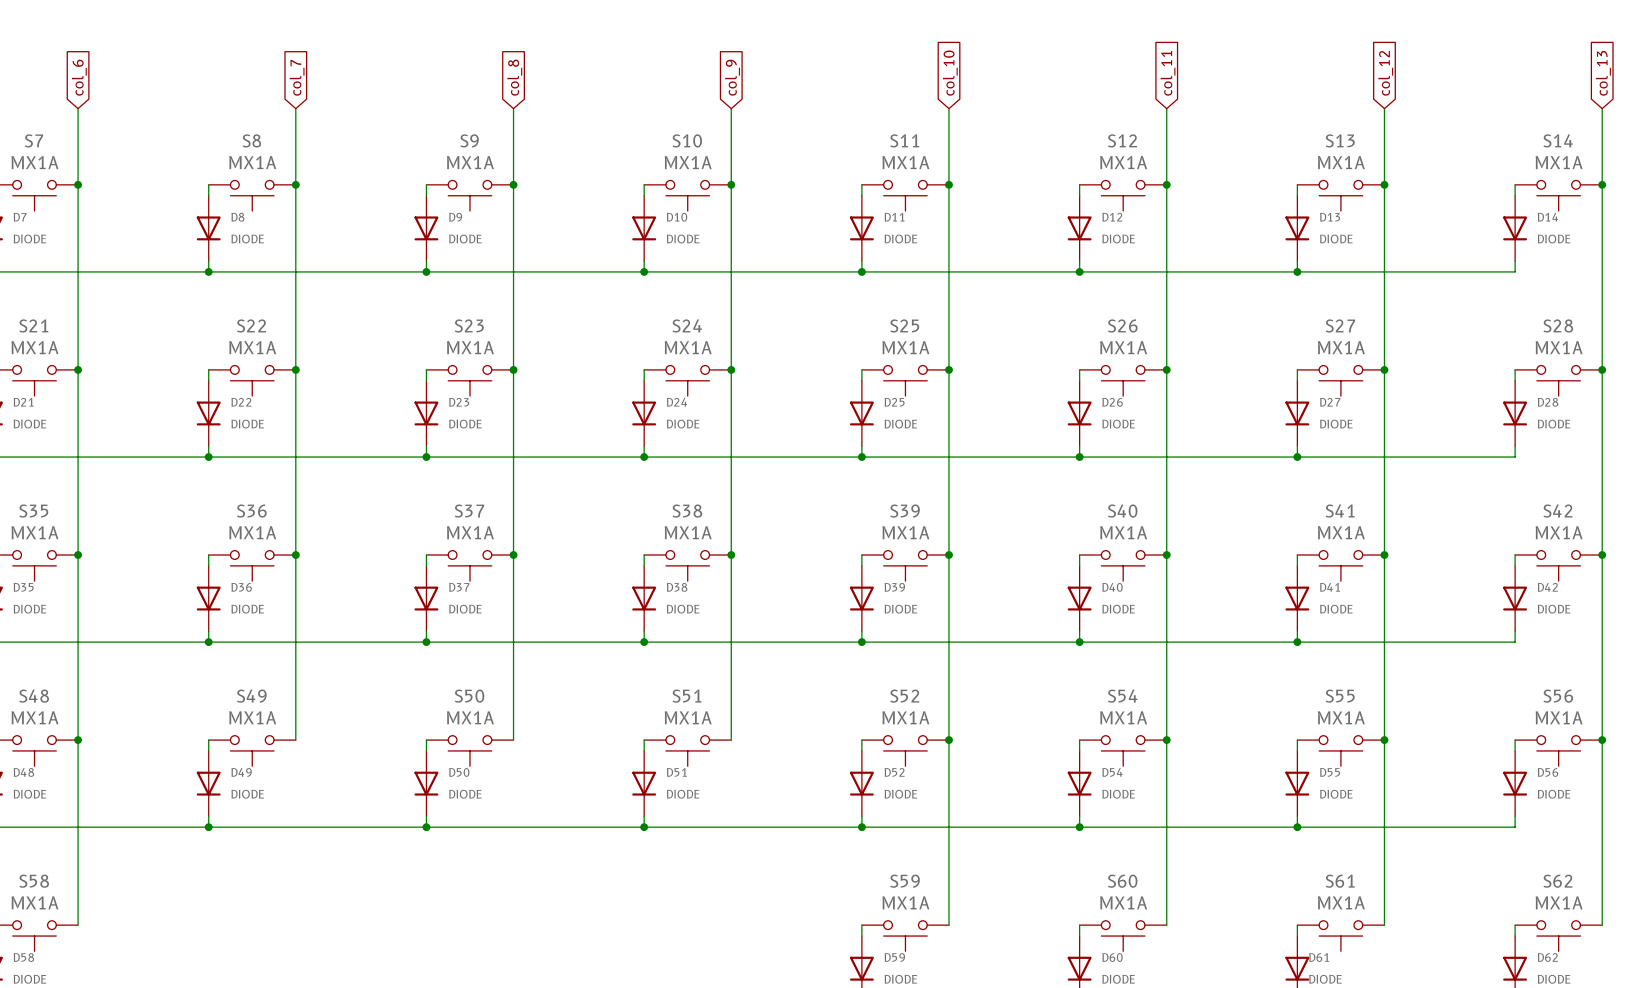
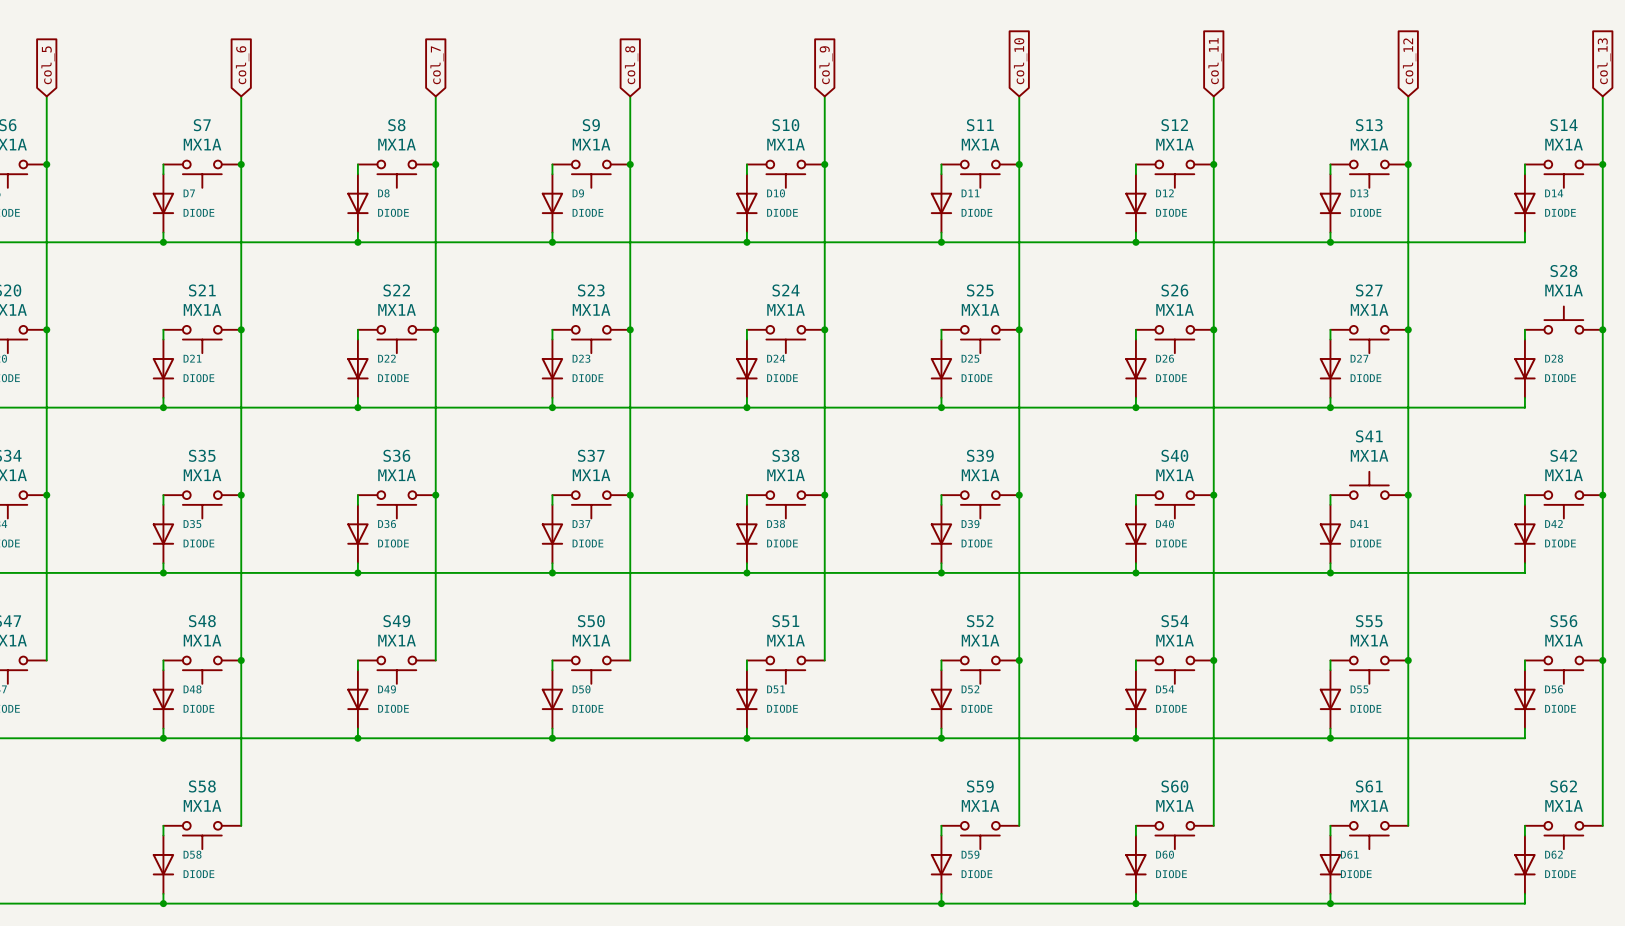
S28 rotation: 0° (1558, 380) -> 180° (1563, 320)
S41 rotation: 0° (1340, 565) -> 180° (1369, 485)

